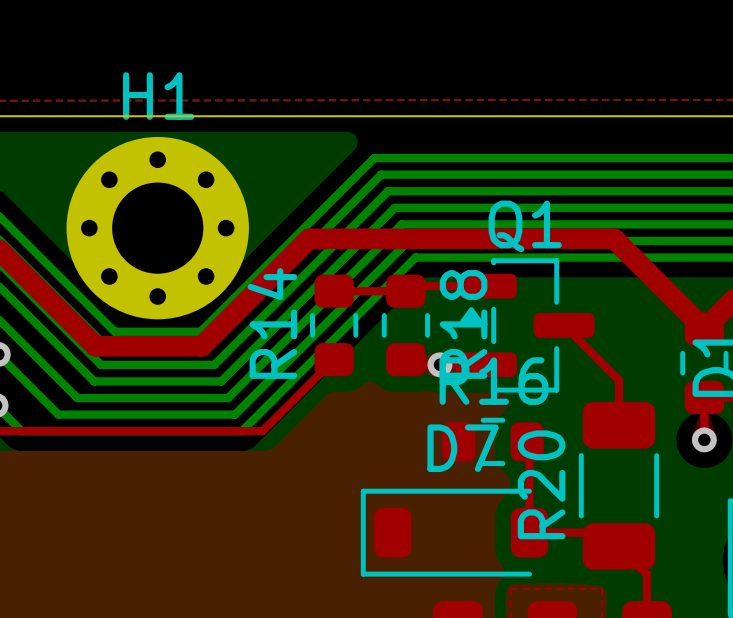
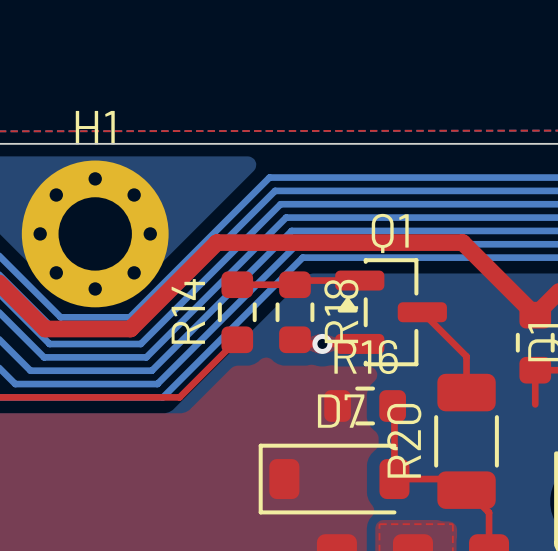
via: (704, 439) -> none

